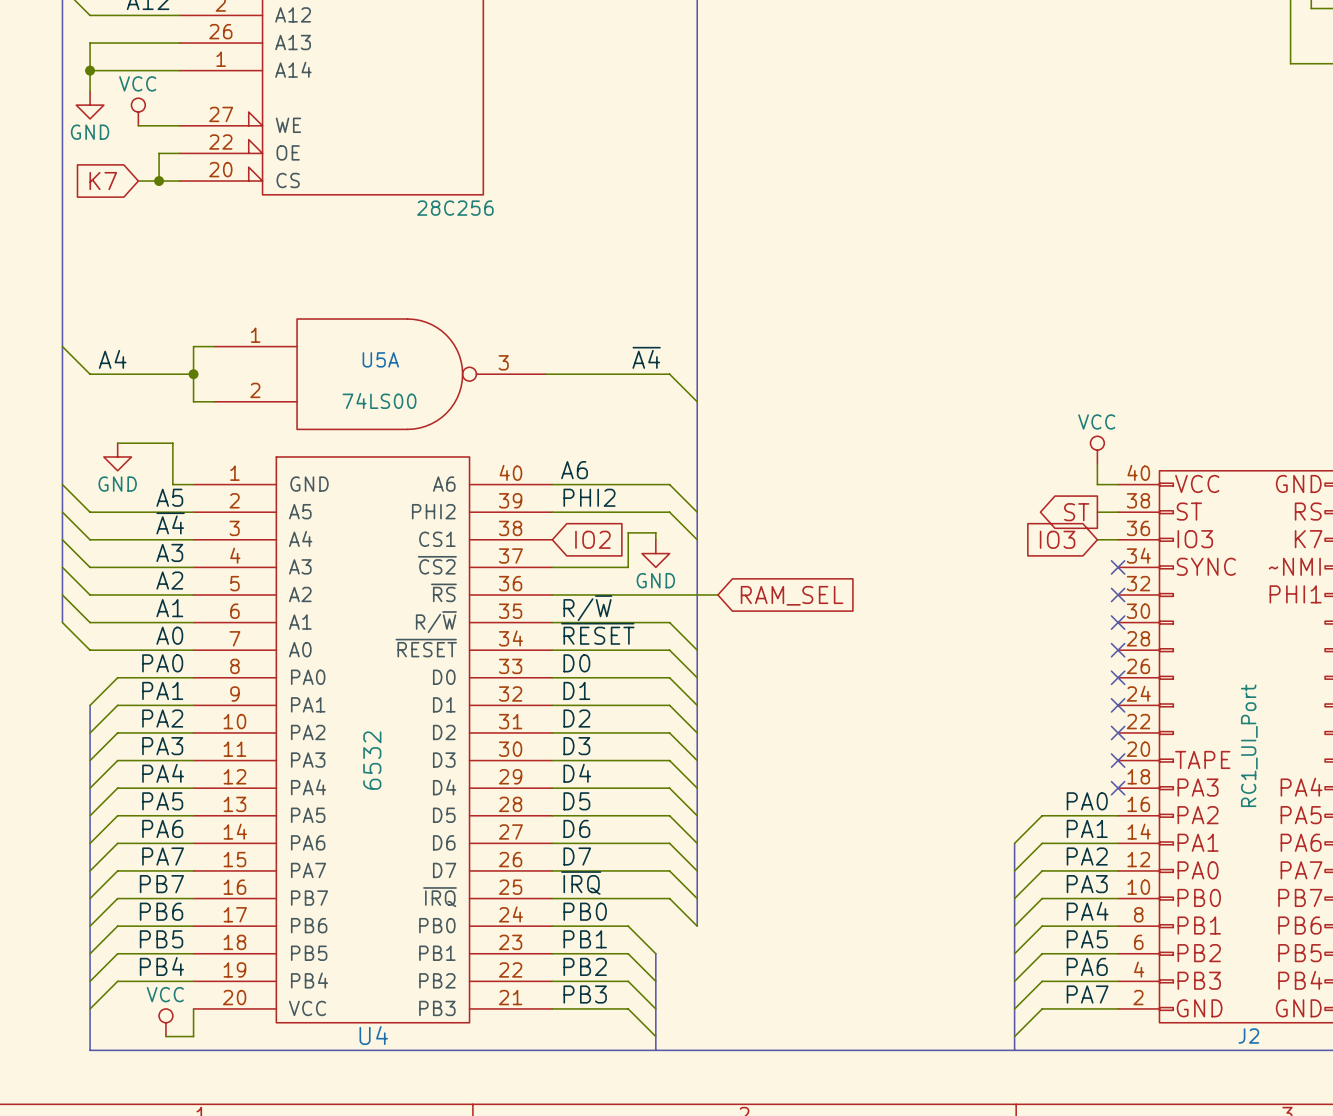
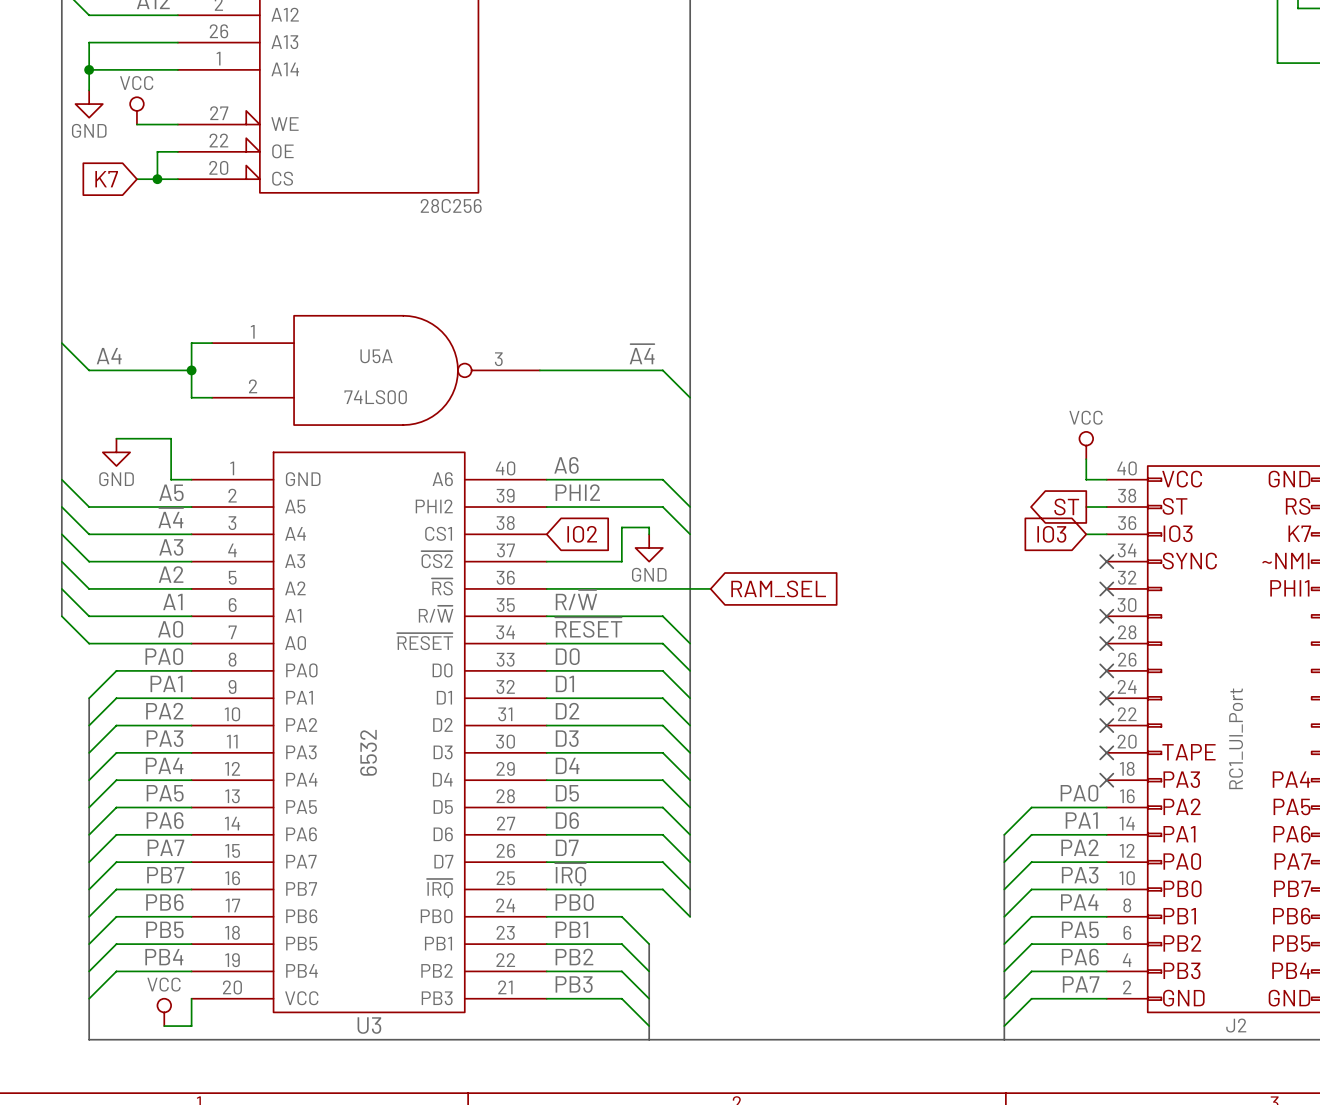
U4 name: U4 (373, 1035) -> U3 (369, 1025)

